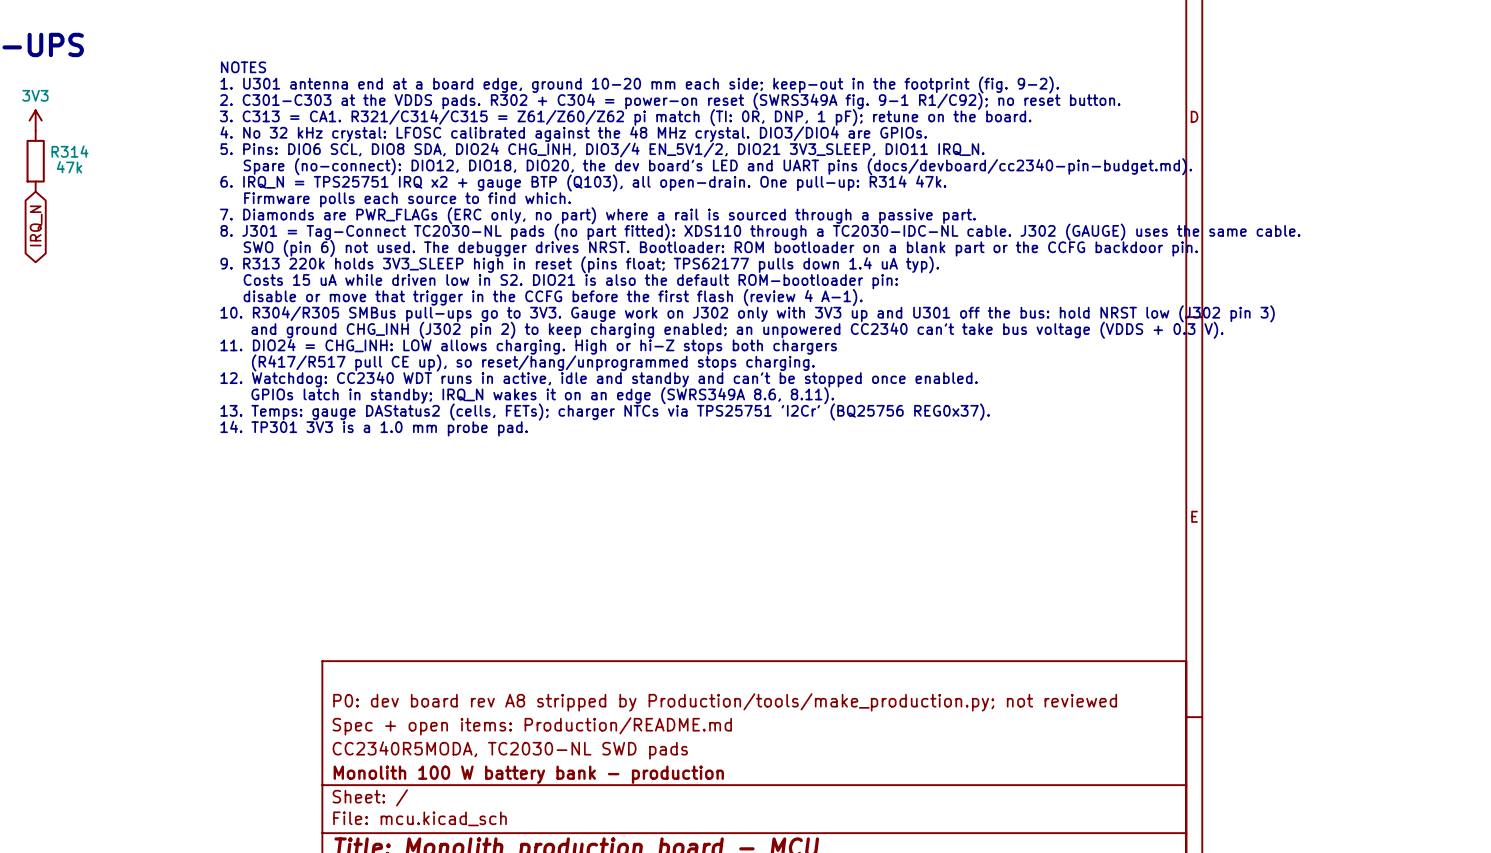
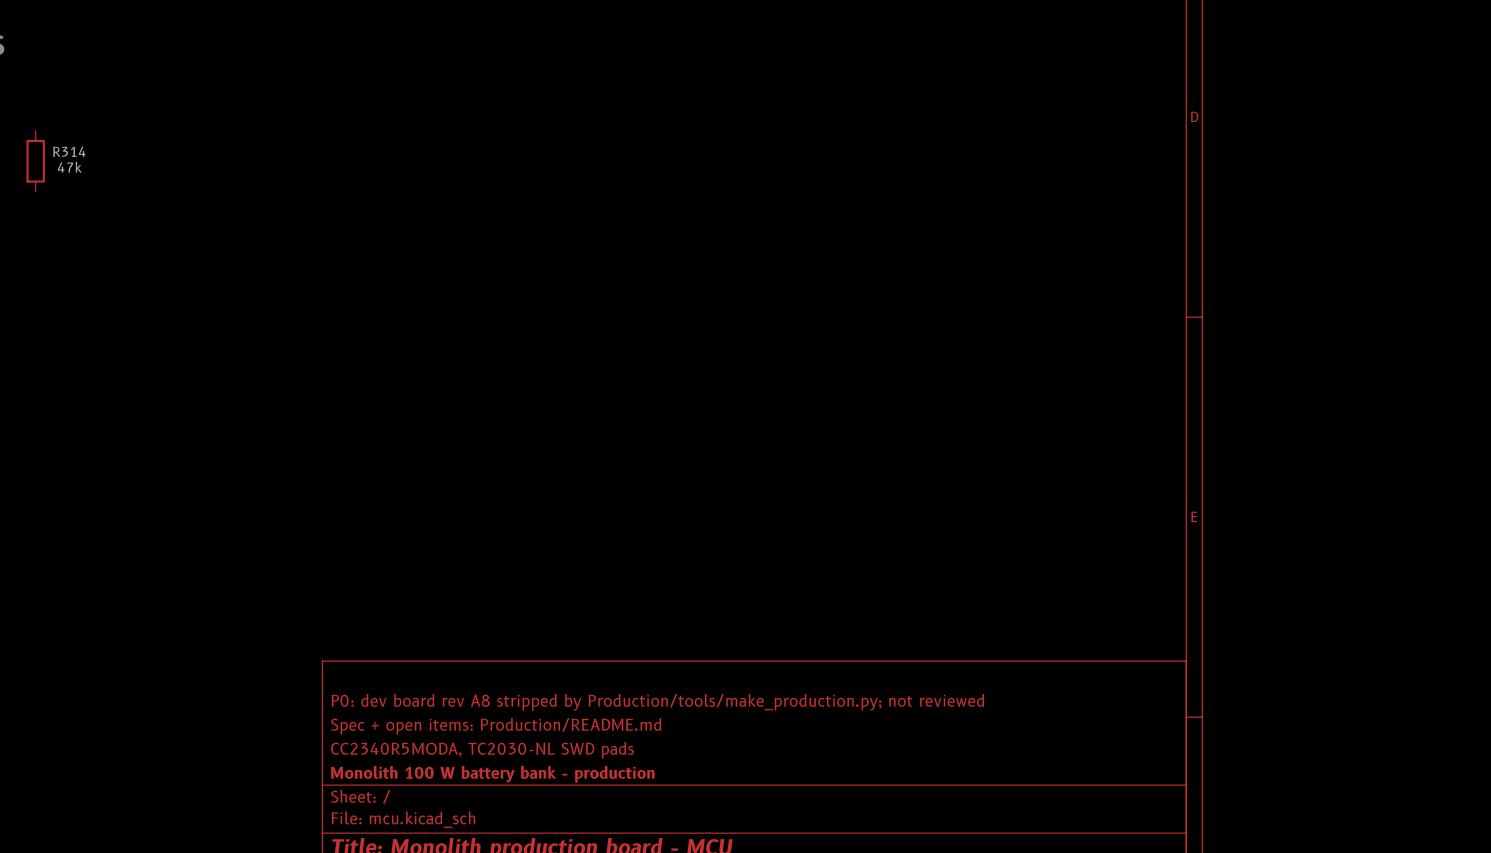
text: NOTES (243, 67) -> none
text: 1. U301 antenna end at a board edge, ground 10-20 mm each side; keep-out in the footprint (fig. 9-2). (639, 84) -> none
text: 2. C301-C303 at the VDDS pads. R302 + C304 = power-on reset (SWRS349A fig. 9-1 R1/C92); no reset button. (670, 101) -> none
text: 3. C313 = CA1. R321/C314/C315 = Z61/Z60/Z62 pi match (TI: 0R, DNP, 1 pF); retune on the board. (625, 117) -> none
power symbol: 3V3 (35, 120) -> none
text: 4. No 32 kHz crystal: LFOSC calibrated against the 48 MHz crystal. DIO3/DIO4 are GPIOs. (573, 134) -> none
text: 5. Pins: DIO6 SCL, DIO8 SDA, DIO24 CHG_INH, DIO3/4 EN_5V1/2, DIO21 3V3_SLEEP, DIO11 IRQ_N. (602, 150) -> none
text: Spare (no-connect): DIO12, DIO18, DIO20, the dev board's LED and UART pins (docs/devboard/cc2340-pin-budget.md). (717, 166) -> none
text: 6. IRQ_N = TPS25751 IRQ x2 + gauge BTP (Q103), all open-drain. One pull-up: R314 47k. (583, 183) -> none
text: Firmware polls each source to find which. (407, 199) -> none
text: 7. Diamonds are PWR_FLAGs (ERC only, no part) where a rail is sourced through a passive part. (597, 215) -> none
global label: IRQ_N (36, 225) -> none
text: 8. J301 = Tag-Connect TC2030-NL pads (no part fitted): XDS110 through a TC2030-IDC-NL cable. J302 (GAUGE) uses the same cable. (760, 232) -> none
text: SWO (pin 6) not used. The debugger drives NRST. Bootloader: ROM bootloader on a blank part or the CCFG backdoor pin. (720, 248) -> none
text: 9. R313 220k holds 3V3_SLEEP high in reset (pins float; TPS62177 pulls down 1.4 uA typ). (579, 264) -> none
text: Costs 15 uA while driven low in S2. DIO21 is also the default ROM-bootloader pin: (570, 281) -> none
text: disable or move that trigger in the CCFG before the first flash (review 4 A-1). (553, 297) -> none
text: 10. R304/R305 SMBus pull-ups go to 3V3. Gauge work on J302 only with 3V3 up and U301 off the bus: hold NRST low (J302 pin 3) (747, 313) -> none
text: and ground CHG_INH (J302 pin 2) to keep charging enabled; an unpowered CC2340 can't take bus voltage (VDDS + 0.3 V). (737, 330) -> none
text: 11. DIO24 = CHG_INH: LOW allows charging. High or hi-Z stops both chargers (528, 346) -> none
text: (R417/R517 pull CE up), so reset/hang/unprogrammed stops charging. (533, 362) -> none
text: 12. Watchdog: CC2340 WDT runs in active, idle and standby and can't be stopped once enabled. (599, 379) -> none
text: GPIOs latch in standby; IRQ_N wakes it on an edge (SWRS349A 8.6, 8.11). (542, 395) -> none
text: 13. Temps: gauge DAStatus2 (cells, FETs); charger NTCs via TPS25751 'I2Cr' (BQ25756 REG0x37). (605, 412) -> none
text: 14. TP301 3V3 is a 1.0 mm probe pad. (374, 428) -> none

